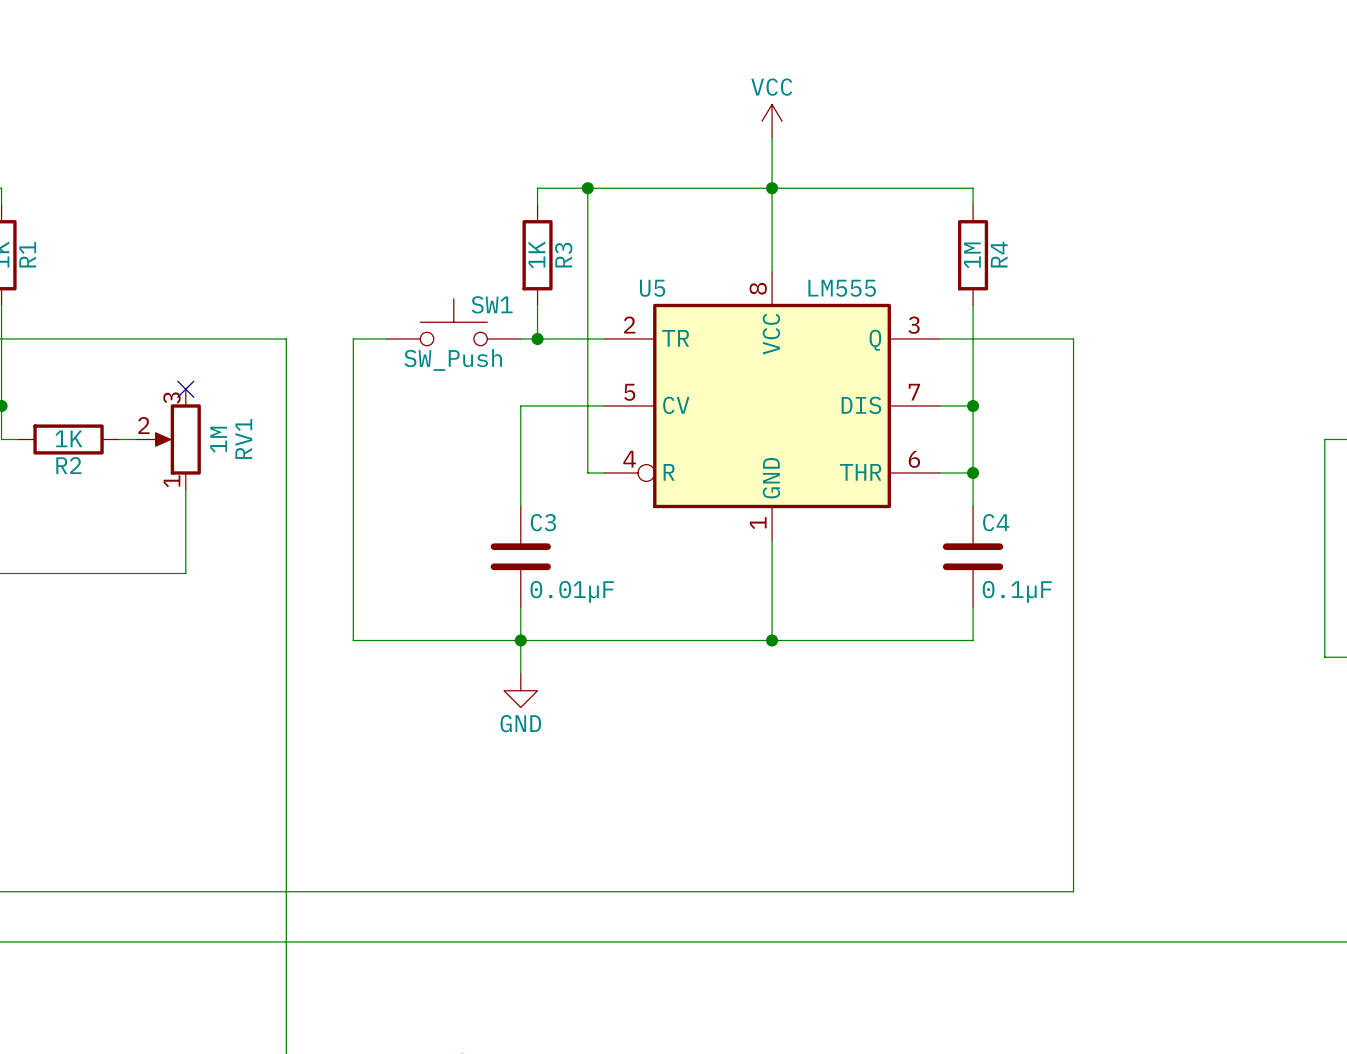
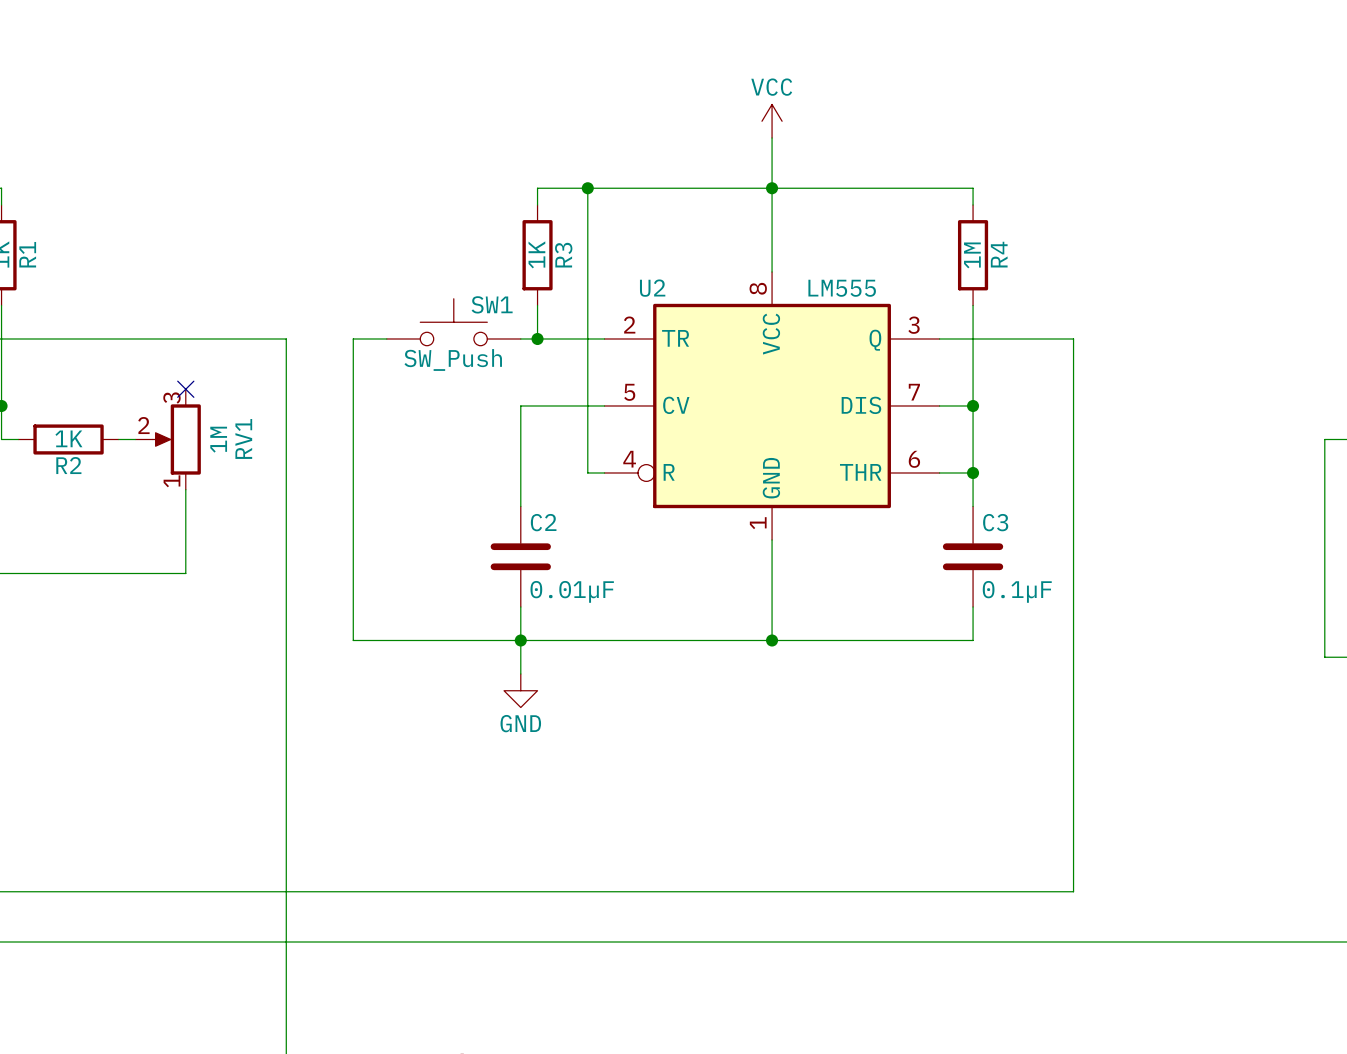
U5 name: U5 (652, 288) -> U2 (652, 288)
C3 name: C3 (543, 522) -> C2 (543, 522)
C4 name: C4 (996, 522) -> C3 (995, 522)

